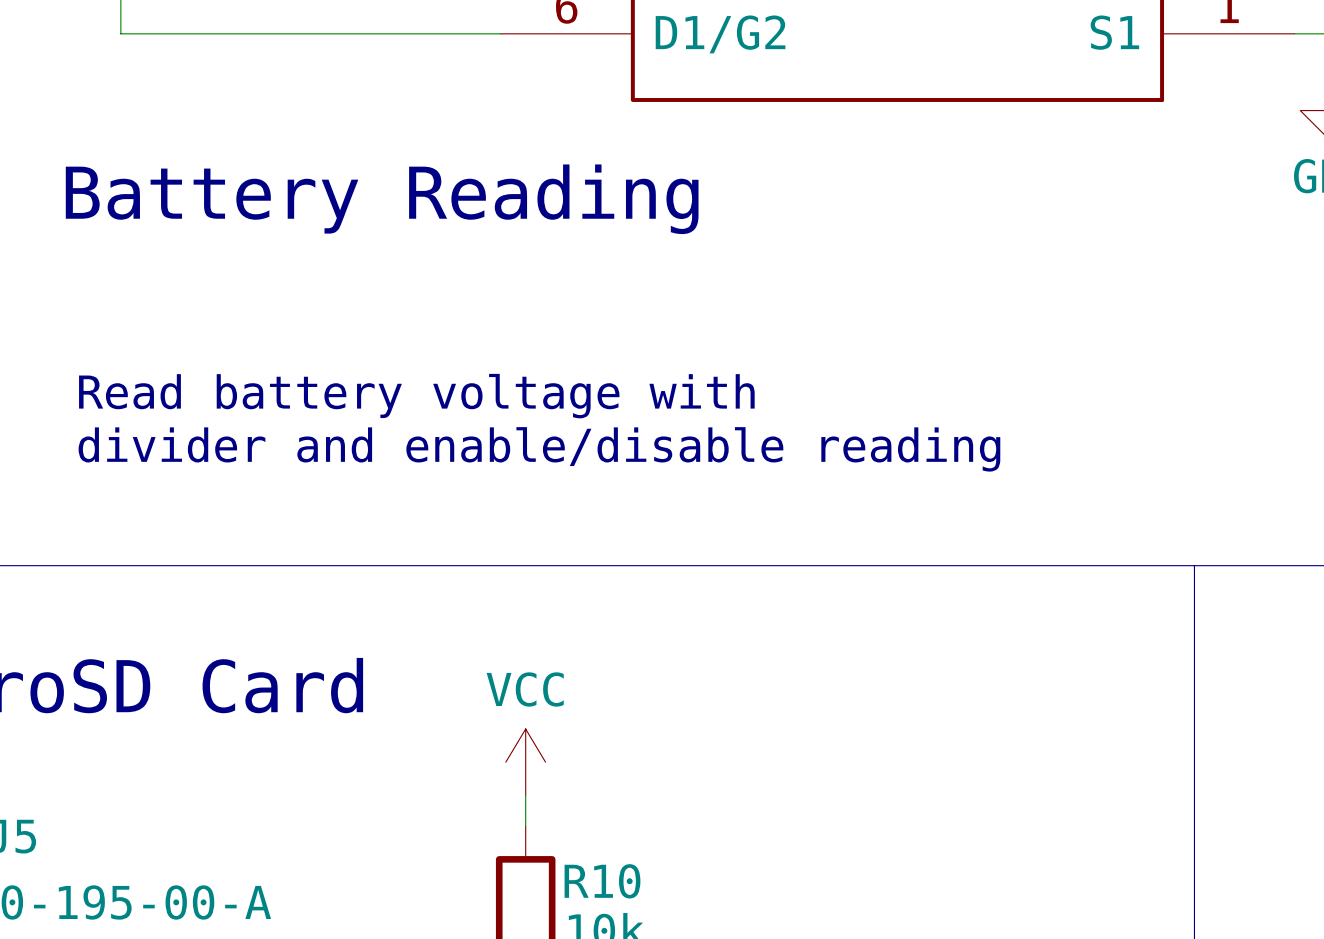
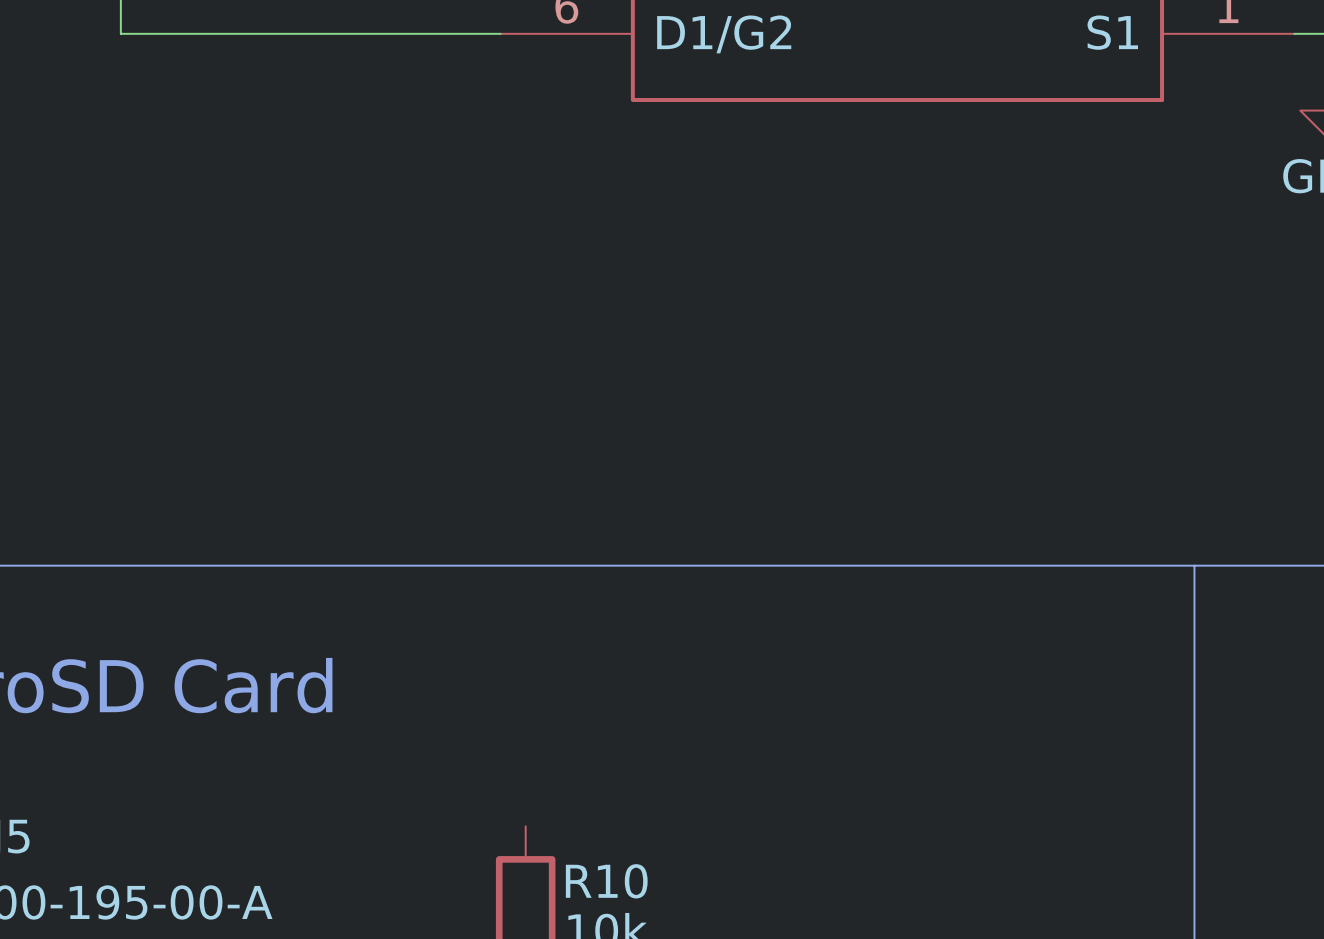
text: Battery Reading (382, 199) -> none
text: Read battery voltage with (416, 396) -> none
text: divider and enable/disable reading (539, 449) -> none
power symbol: VCC (525, 762) -> none
wire: (525, 795) (525, 826) -> none

